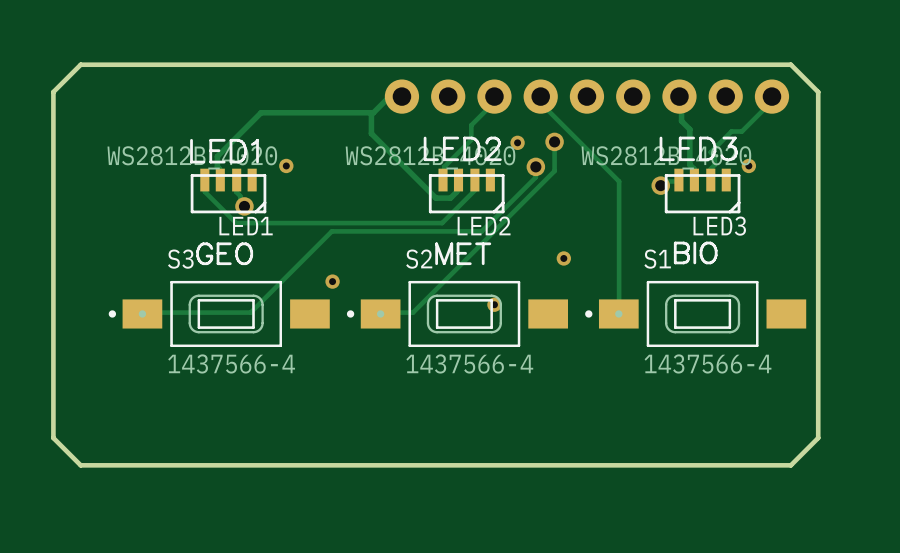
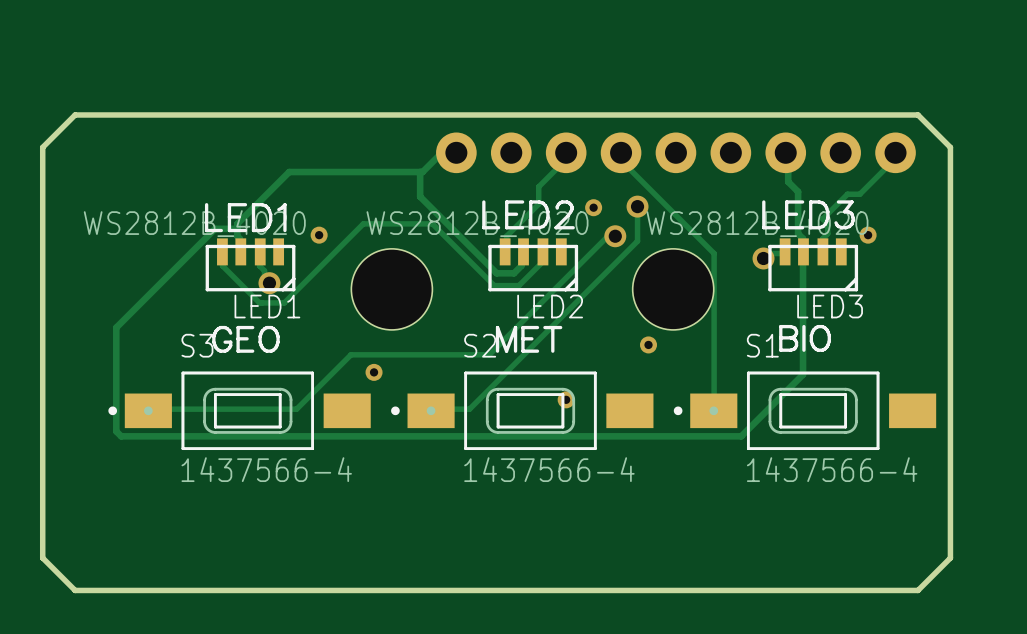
track: none -> (237, 228) (215, 228) (116, 327) (116, 431) (121, 436) (741, 436) (803, 374) (803, 251)
track: (535, 166) (535, 177) (481, 231) (331, 231) (250, 312) -> (612, 231) (489, 354) (350, 354) (296, 409) (276, 409)
track: (474, 180) (475, 189) (442, 223) (256, 223) -> (542, 251) (541, 263) (518, 285) (494, 285) (432, 223) (363, 223) (284, 302)
hole: none -> (391, 289)
hole: none -> (673, 289)

